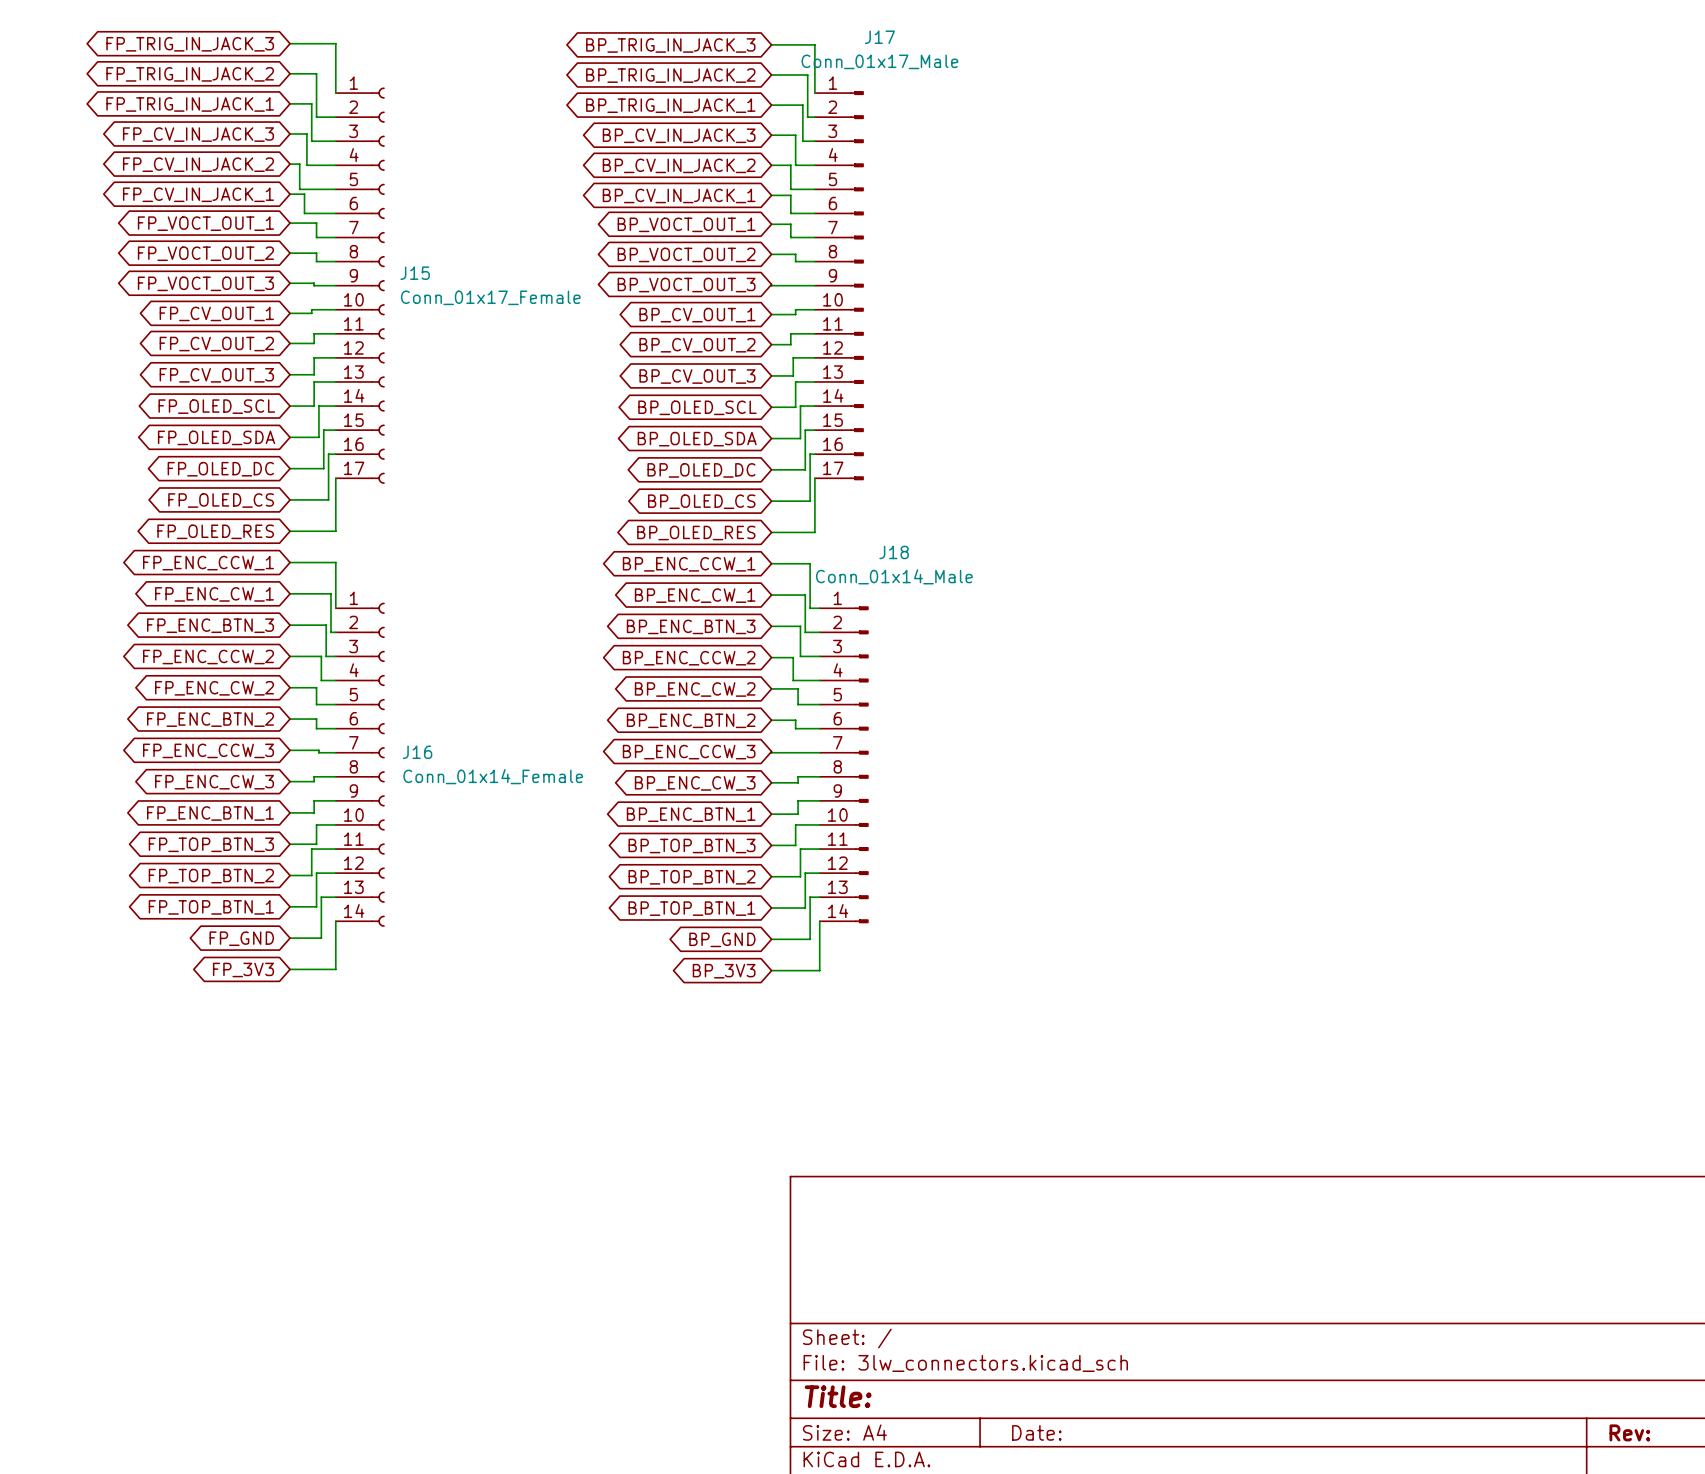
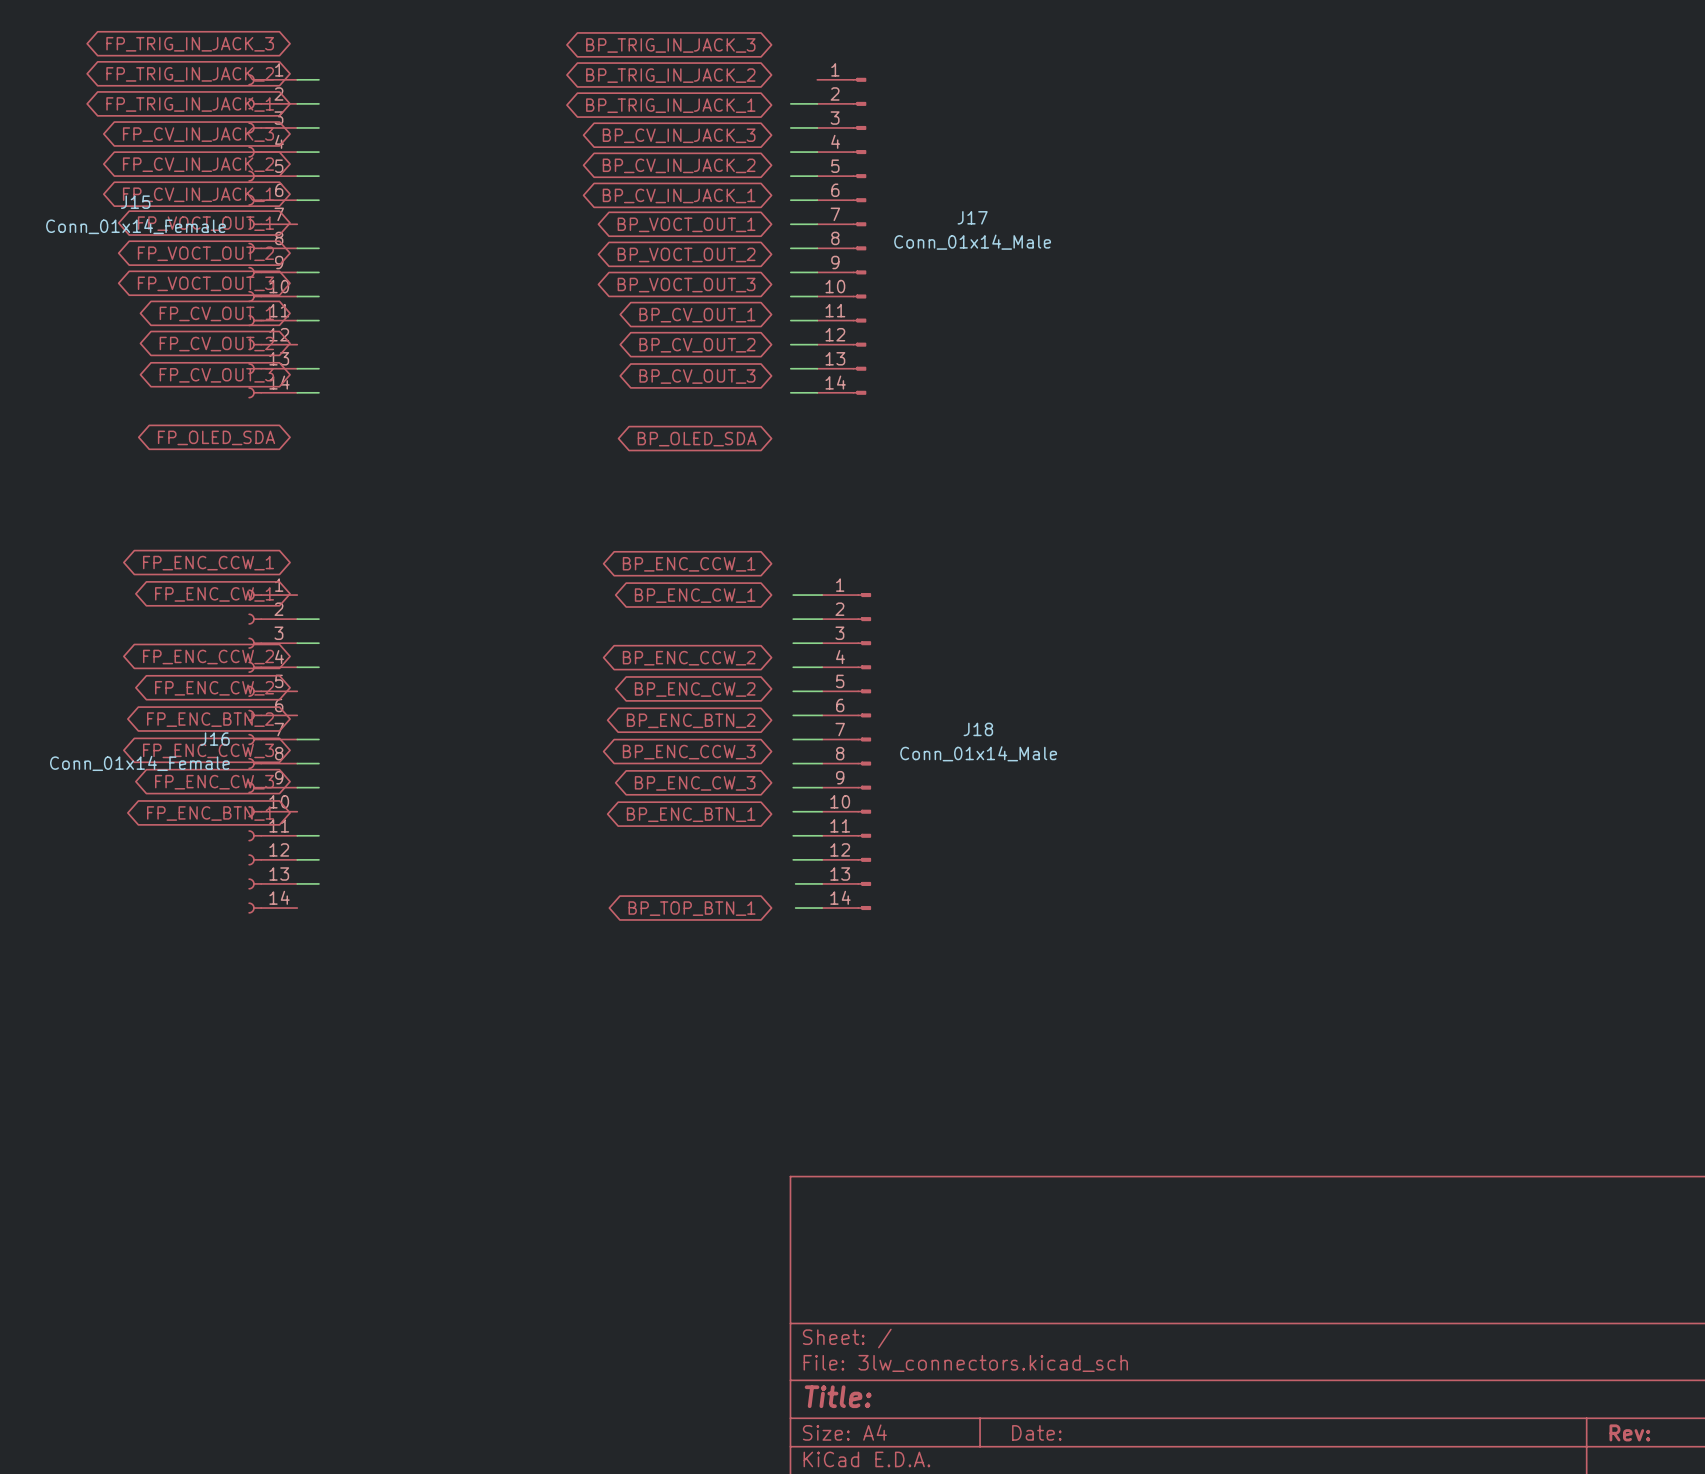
J17 name position: J17 (879, 37) -> J17 (972, 217)
wire: (290, 43) (335, 43) (335, 93) -> none
wire: (771, 44) (814, 44) (814, 93) -> none
J17 value: Conn_01x17_Male (879, 61) -> Conn_01x14_Male (972, 242)
wire: (290, 73) (316, 73) (316, 117) (335, 117) -> none
wire: (771, 75) (807, 75) (807, 117) (814, 117) -> none
wire: none -> (297, 79) (318, 79)
J15 symbol: [335, 87, 385, 484] -> [248, 74, 298, 399]
J17 symbol: [814, 91, 864, 481] -> [817, 77, 867, 395]
wire: (311, 103) (311, 141) (335, 141) -> (311, 103) (318, 103)
wire: none -> (790, 103) (817, 103)
wire: (771, 105) (802, 105) (802, 141) (814, 141) -> none
wire: none -> (297, 127) (318, 127)
wire: none -> (790, 127) (817, 127)
wire: (290, 133) (306, 133) (306, 165) (335, 165) -> none
wire: (771, 135) (795, 135) (795, 165) (814, 165) -> none
wire: none -> (297, 152) (318, 152)
wire: none -> (790, 152) (817, 152)
wire: (290, 164) (299, 164) (299, 189) (335, 189) -> none
wire: (771, 165) (790, 165) (790, 189) (814, 189) -> none
wire: none -> (297, 176) (318, 176)
wire: none -> (790, 176) (817, 176)
wire: (290, 194) (304, 194) (304, 213) (335, 213) -> none
wire: (771, 195) (790, 195) (790, 213) (814, 213) -> none
wire: none -> (297, 200) (318, 200)
wire: none -> (790, 200) (817, 200)
wire: (290, 223) (316, 223) (316, 237) (335, 237) -> none
wire: (771, 224) (790, 224) (790, 237) (814, 237) -> none
wire: none -> (790, 224) (817, 224)
wire: none -> (297, 248) (318, 248)
wire: none -> (790, 248) (817, 248)
wire: (290, 253) (316, 253) (316, 261) (335, 261) -> none
wire: (771, 254) (795, 254) (795, 261) (814, 261) -> none
wire: none -> (297, 272) (318, 272)
wire: none -> (790, 272) (817, 272)
J15 name position: J15 (415, 273) -> J15 (135, 202)
wire: (290, 283) (335, 285) -> none
wire: (771, 284) (814, 285) -> none
wire: none -> (297, 296) (318, 296)
wire: none -> (790, 296) (817, 296)
J15 value: Conn_01x17_Female (490, 297) -> Conn_01x14_Female (135, 226)
wire: (335, 309) (311, 309) (311, 313) (290, 313) -> none
wire: (814, 309) (795, 309) (795, 314) (771, 314) -> none
wire: none -> (297, 320) (318, 320)
wire: none -> (790, 320) (817, 320)
wire: (335, 333) (314, 333) (314, 343) (290, 343) -> none
wire: (814, 333) (790, 333) (790, 344) (771, 344) -> none
wire: none -> (790, 344) (817, 344)
wire: (335, 357) (314, 357) (314, 374) (290, 374) -> none
wire: (814, 357) (793, 357) (793, 375) (771, 375) -> none
wire: none -> (297, 368) (318, 368)
wire: none -> (790, 368) (817, 368)
wire: (335, 381) (314, 381) (314, 406) (290, 406) -> none
wire: (814, 381) (795, 381) (795, 407) (771, 407) -> none
wire: none -> (297, 392) (318, 392)
wire: none -> (790, 392) (817, 392)
global label: FP_OLED_SCL (216, 406) -> none
wire: (335, 406) (318, 406) (318, 437) (290, 437) -> none
wire: (814, 406) (800, 406) (800, 438) (771, 438) -> none
global label: BP_OLED_SCL (697, 407) -> none
wire: (335, 430) (323, 430) (323, 468) (290, 468) -> none
wire: (814, 430) (805, 430) (805, 469) (771, 469) -> none
wire: (335, 454) (328, 454) (328, 499) (290, 499) -> none
wire: (814, 454) (810, 454) (810, 501) (771, 501) -> none
global label: FP_OLED_DC (220, 469) -> none
global label: BP_OLED_DC (701, 470) -> none
wire: (335, 478) (335, 531) (290, 531) -> none
wire: (814, 478) (814, 532) (771, 532) -> none
global label: FP_OLED_CS (221, 500) -> none
global label: BP_OLED_CS (701, 501) -> none
global label: FP_OLED_RES (215, 531) -> none
global label: BP_OLED_RES (696, 533) -> none
J18 name position: J18 (894, 552) -> J18 (978, 729)
wire: (290, 562) (335, 562) (335, 608) -> none
wire: (771, 563) (810, 563) (810, 608) (819, 608) -> none
J18 value position: Conn_01x14_Male (894, 576) -> Conn_01x14_Male (978, 753)
wire: (290, 593) (330, 593) (330, 632) (335, 632) -> none
wire: (771, 595) (793, 595) -> none
wire: (805, 595) (805, 632) (819, 632) -> (805, 595) (822, 595)
wire: none -> (297, 619) (318, 619)
wire: none -> (793, 619) (822, 619)
global label: FP_ENC_BTN_3 (210, 625) -> none
wire: (290, 625) (326, 625) (326, 656) (335, 656) -> none
global label: BP_ENC_BTN_3 (691, 626) -> none
wire: (771, 626) (800, 626) (800, 656) (819, 656) -> none
wire: none -> (297, 643) (318, 643)
wire: none -> (793, 643) (822, 643)
wire: (290, 656) (321, 656) (321, 680) (335, 680) -> none
wire: (771, 657) (793, 657) (793, 680) (819, 680) -> none
wire: none -> (297, 667) (318, 667)
wire: none -> (793, 667) (822, 667)
wire: (290, 687) (316, 687) (316, 704) (335, 704) -> none
wire: (771, 688) (798, 688) (798, 704) (819, 704) -> none
wire: none -> (793, 691) (822, 691)
wire: none -> (793, 715) (822, 715)
wire: (290, 719) (316, 719) (316, 728) (335, 728) -> none
wire: (771, 720) (795, 720) (795, 728) (819, 728) -> none
wire: none -> (297, 739) (318, 739)
wire: none -> (793, 739) (822, 739)
wire: (290, 750) (318, 750) (318, 752) (335, 752) -> none
wire: (771, 751) (819, 752) -> none
wire: none -> (297, 763) (318, 763)
wire: none -> (793, 763) (822, 763)
J16 flip: as is (377, 764) -> left-right (255, 751)
J18 position: (844, 764) -> (846, 751)
wire: (335, 776) (314, 776) (314, 781) (290, 781) -> none
wire: (819, 776) (798, 776) (798, 782) (771, 782) -> none
wire: none -> (297, 787) (318, 787)
wire: none -> (793, 787) (822, 787)
wire: (335, 800) (314, 800) (314, 812) (290, 812) -> none
wire: (819, 800) (798, 800) (798, 814) (771, 814) -> none
wire: none -> (793, 811) (822, 811)
wire: (335, 824) (316, 824) (316, 844) (290, 844) -> none
wire: (819, 824) (795, 824) (795, 845) (771, 845) -> none
wire: none -> (297, 835) (318, 835)
wire: none -> (793, 835) (822, 835)
global label: FP_TOP_BTN_3 (211, 844) -> none
global label: BP_TOP_BTN_3 (692, 846) -> none
wire: (335, 849) (311, 849) (311, 875) (290, 875) -> none
wire: (819, 849) (800, 849) (800, 876) (771, 876) -> none
wire: none -> (297, 859) (318, 859)
wire: none -> (793, 859) (822, 859)
wire: (335, 873) (316, 873) (316, 906) (290, 906) -> none
wire: (819, 873) (805, 873) (805, 908) -> (822, 908) (805, 908)
global label: FP_TOP_BTN_2 (211, 876) -> none
global label: BP_TOP_BTN_2 (692, 877) -> none
wire: none -> (297, 883) (318, 883)
wire: none -> (795, 883) (822, 883)
wire: (335, 897) (321, 897) (321, 938) (290, 938) -> none
wire: (819, 897) (810, 897) (810, 939) (771, 939) -> none
global label: FP_TOP_BTN_1 (211, 907) -> none
wire: (771, 908) (795, 908) -> none
wire: (335, 921) (335, 969) (290, 969) -> none
wire: (819, 921) (819, 970) (771, 970) -> none
global label: FP_GND (241, 938) -> none
global label: BP_GND (722, 939) -> none
global label: FP_3V3 (243, 969) -> none
global label: BP_3V3 (724, 971) -> none

